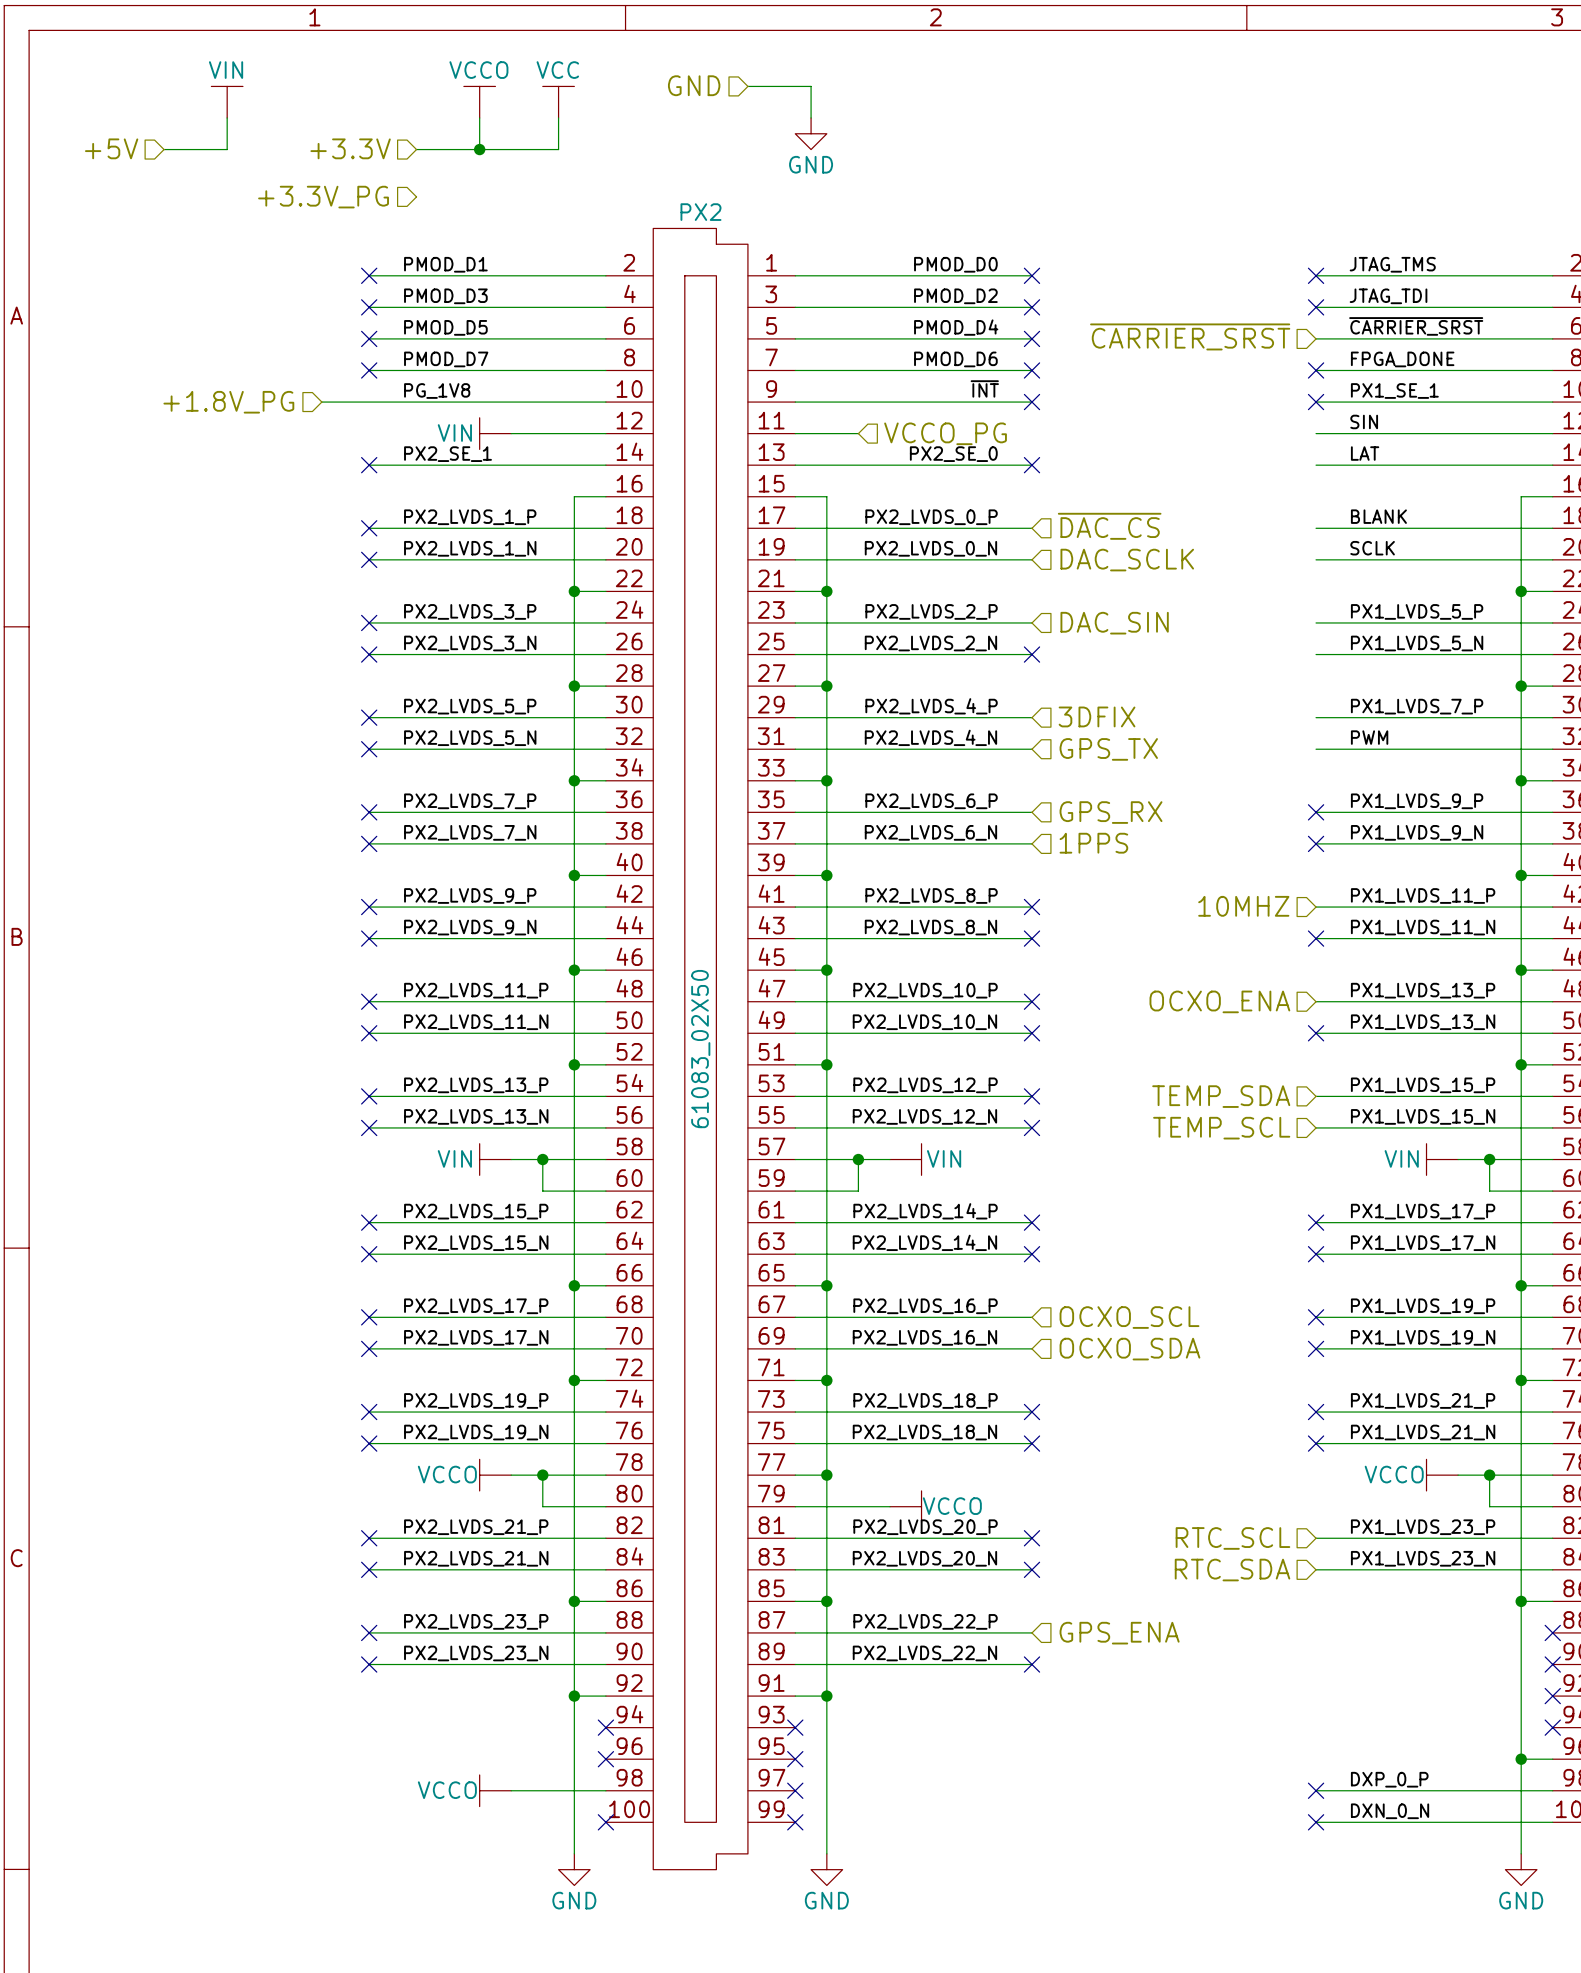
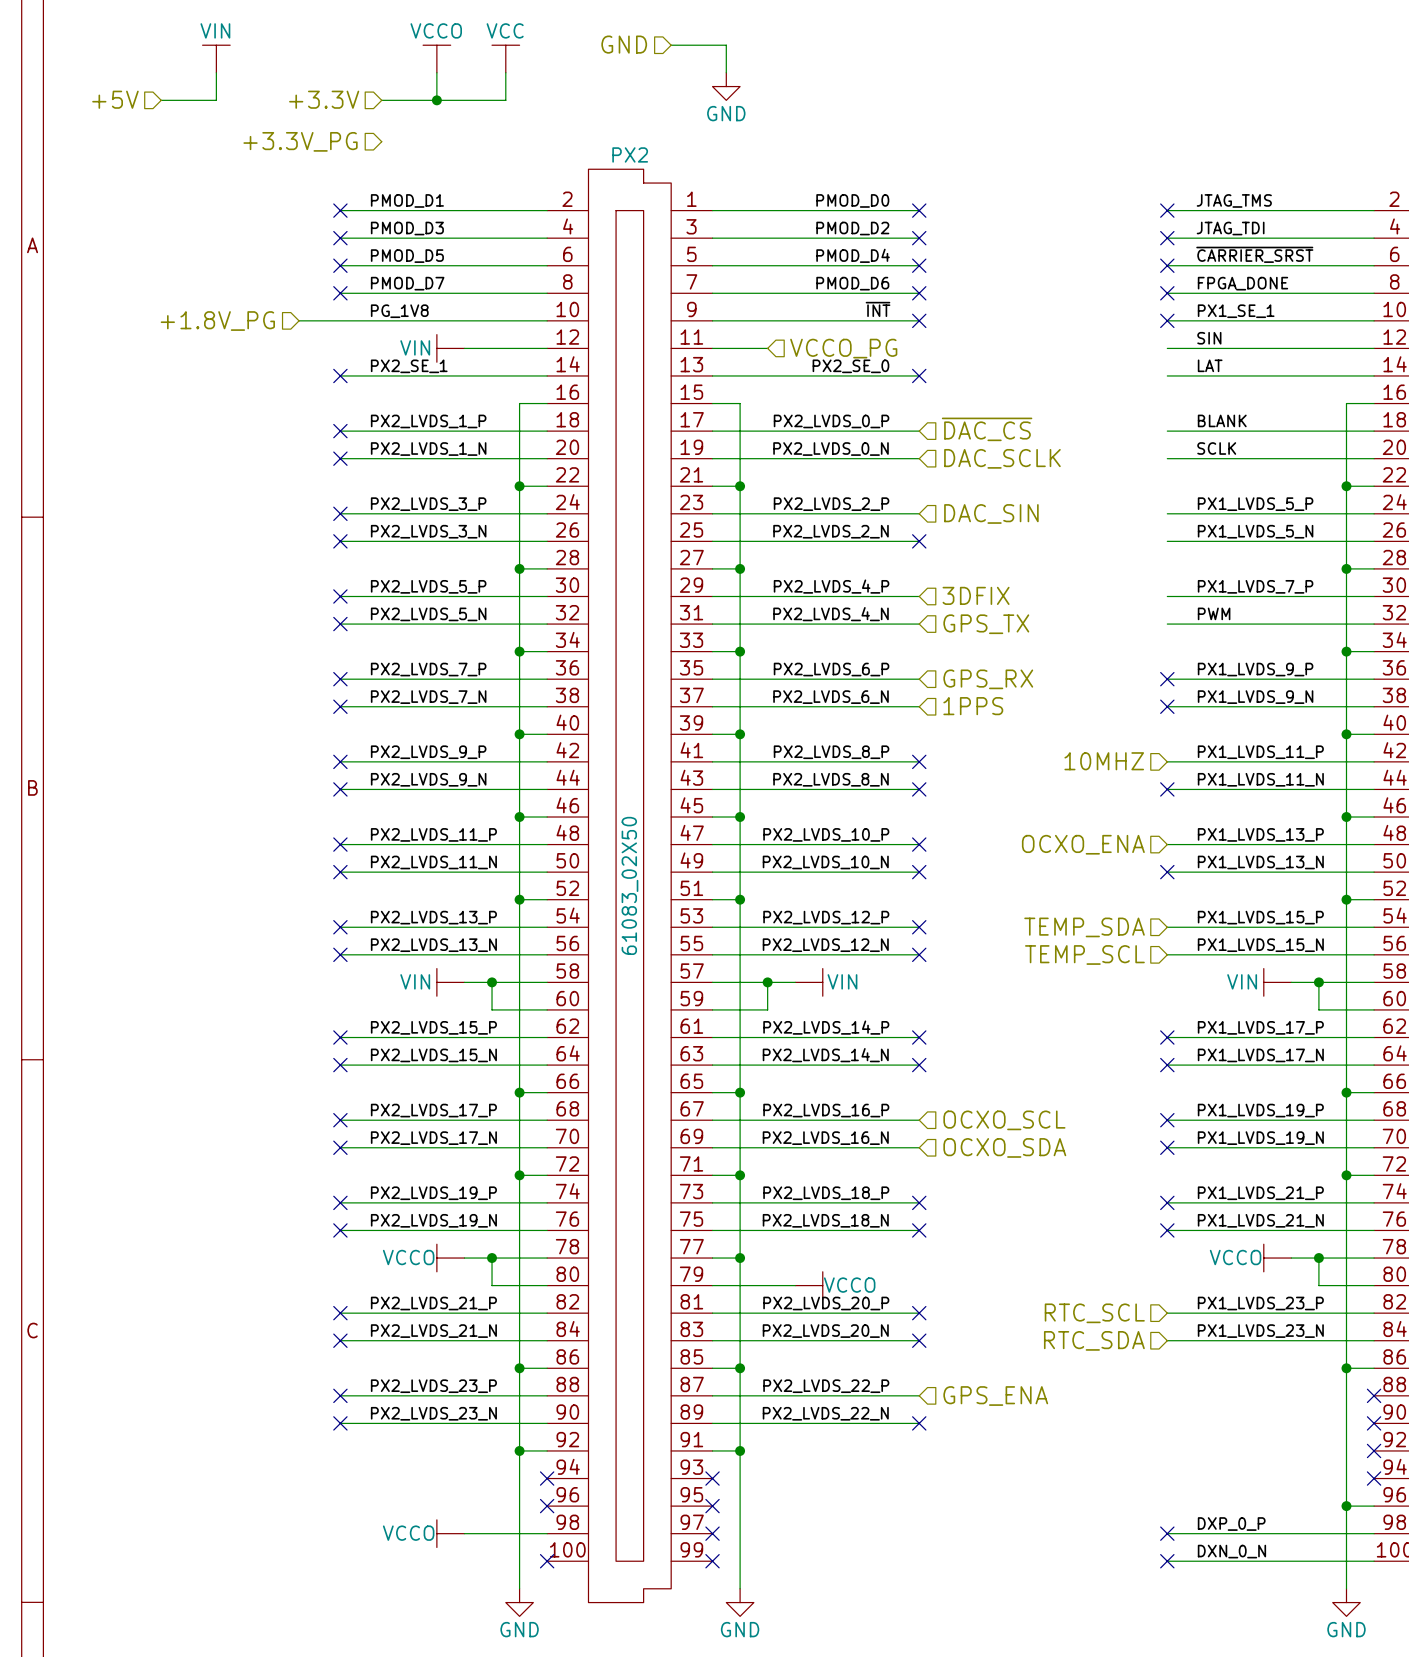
hierarchical label: ~{CARRIER_SRST} (1190, 336) -> none
no-connect mark: none -> (1167, 265)

